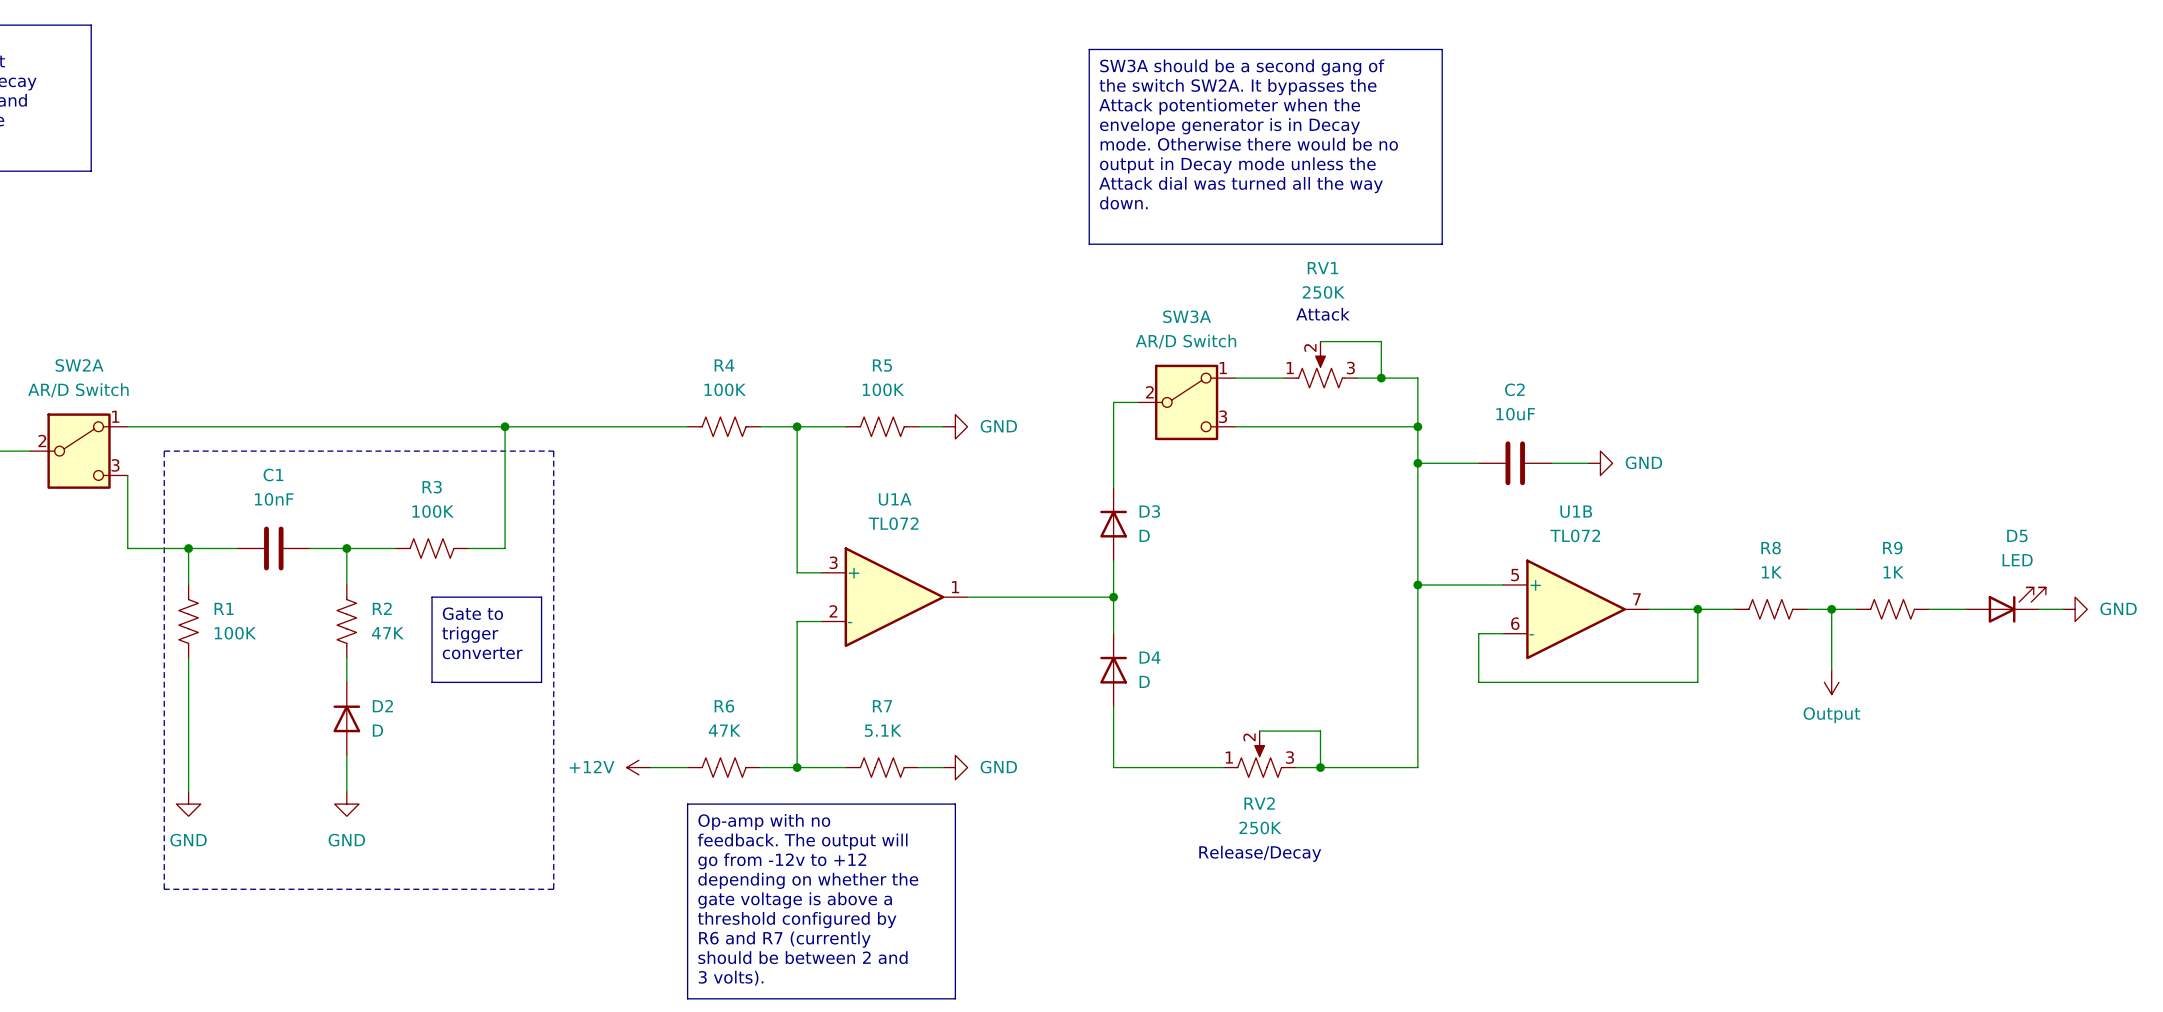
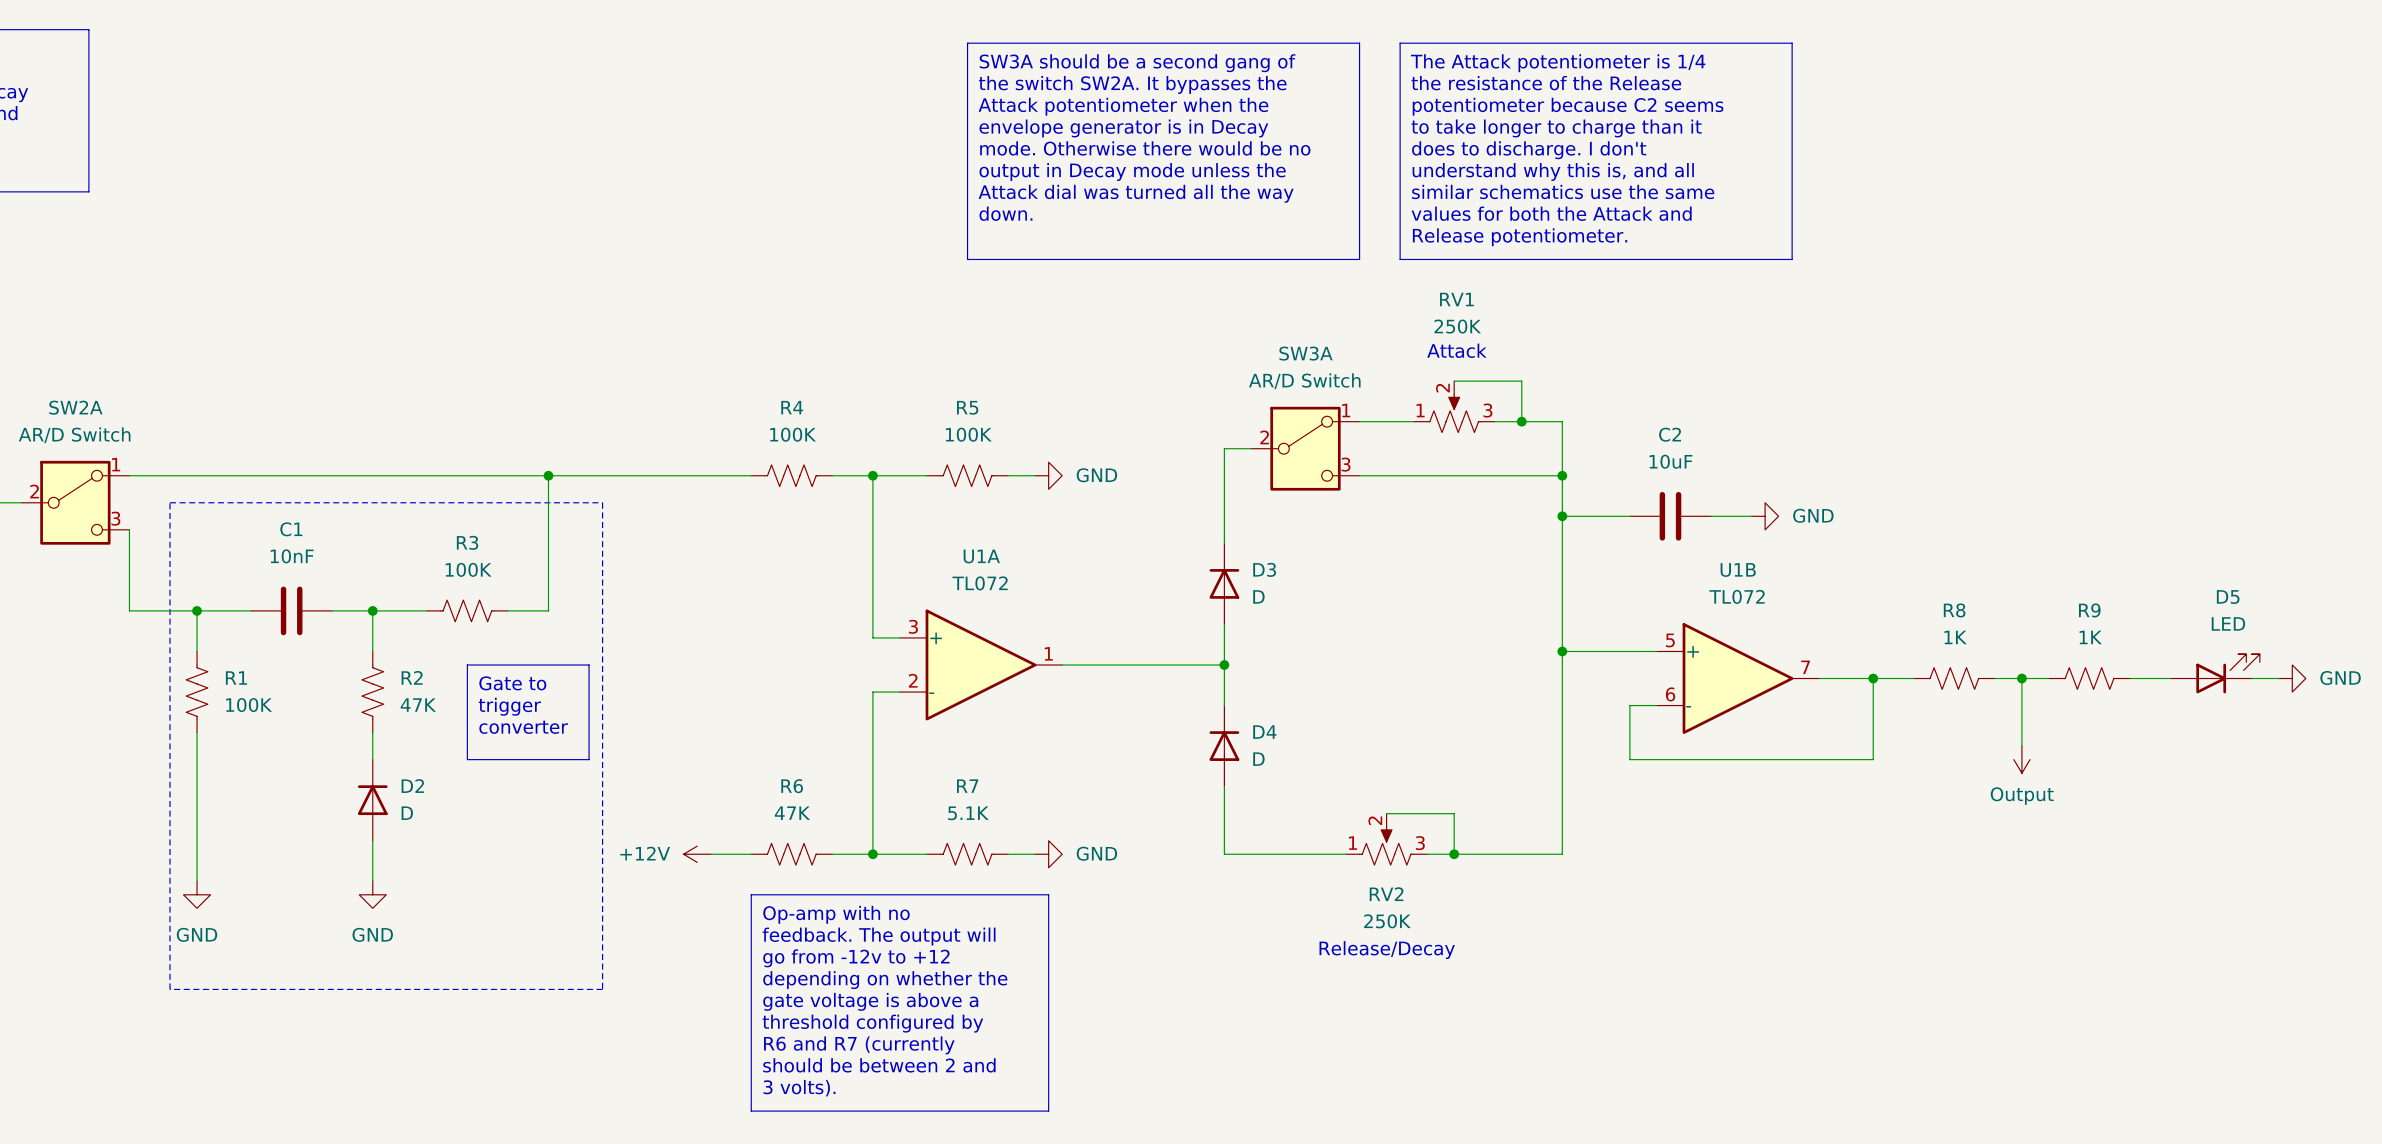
line: none -> (967, 43) (1359, 43) (1359, 259) (967, 259) (967, 43)
line: (1089, 49) (1442, 49) (1442, 244) (1089, 244) (1089, 49) -> (1400, 43) (1792, 43) (1792, 259) (1400, 259) (1400, 43)
text: none -> The Attack potentiometer is 1/4 (1558, 63)
text position: SW3A should be a second gang of (1242, 67) -> SW3A should be a second gang of (1137, 63)
text: none -> the resistance of the Release (1546, 83)
text position: the switch SW2A. It bypasses the (1237, 87) -> the switch SW2A. It bypasses the (1132, 84)
text: none -> potentiometer because C2 seems (1568, 106)
text position: Attack potentiometer when the (1229, 106) -> Attack potentiometer when the (1123, 106)
text: none -> to take longer to charge than it (1556, 128)
text position: envelope generator is in Decay (1230, 126) -> envelope generator is in Decay (1123, 128)
text: none -> does to discharge. I don't (1529, 150)
text position: mode. Otherwise there would be no (1249, 144) -> mode. Otherwise there would be no (1145, 148)
text: none -> understand why this is, and all (1553, 171)
text position: output in Decay mode unless the (1237, 165) -> output in Decay mode unless the (1132, 171)
text: none -> similar schematics use the same (1563, 191)
text position: Attack dial was turned all the way (1241, 185) -> Attack dial was turned all the way (1136, 193)
text: none -> values for both the Attack and (1551, 213)
text position: down. (1123, 203) -> down. (1005, 213)
text: none -> Release potentiometer. (1520, 237)

